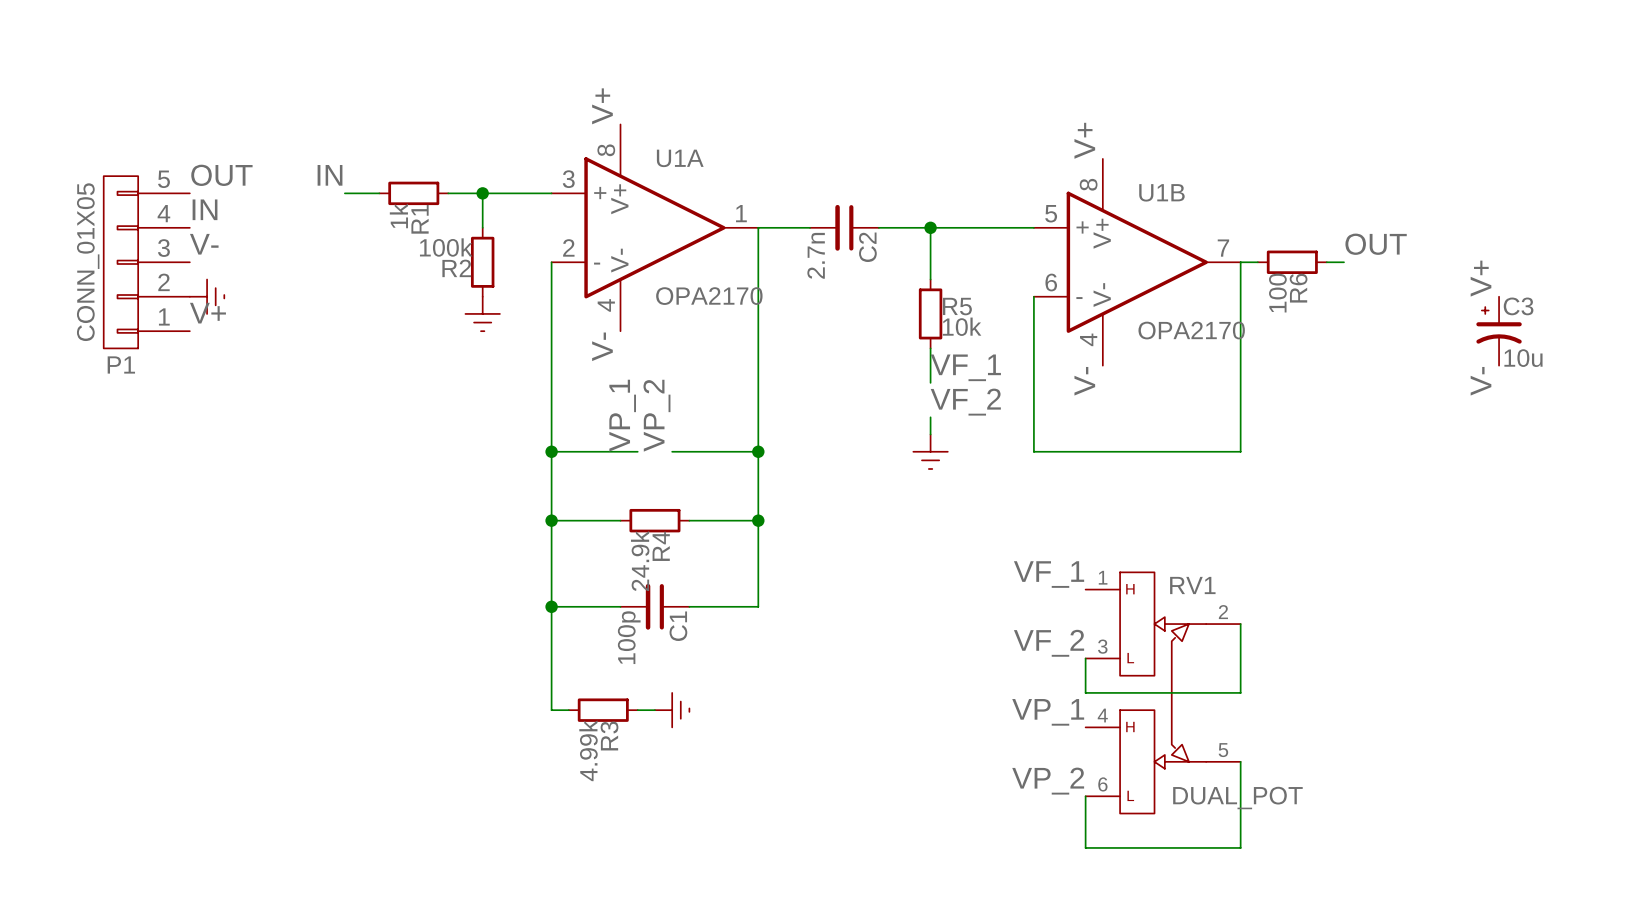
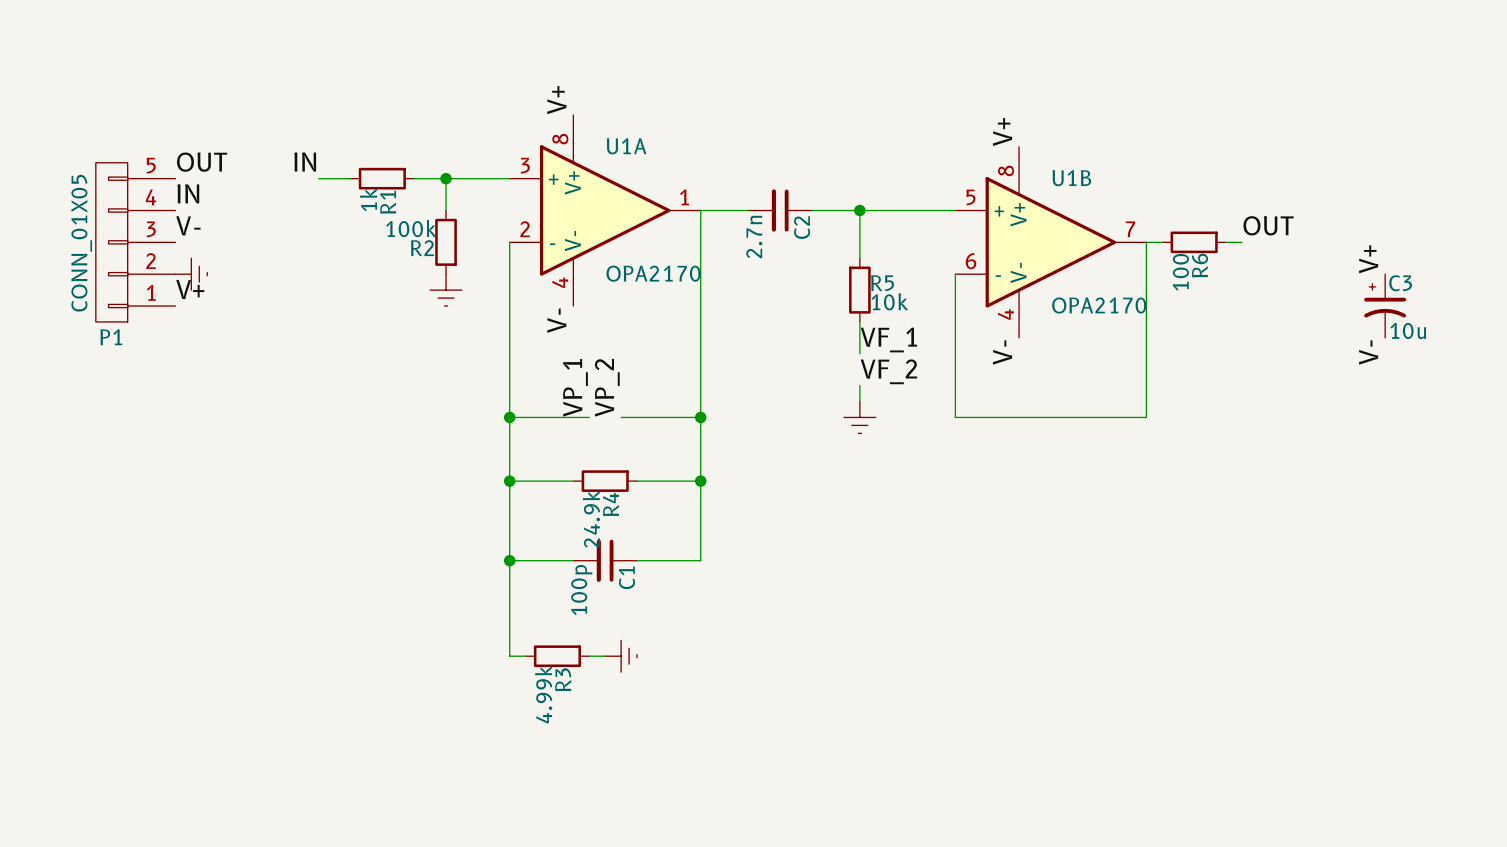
label: VF_1 (1049, 574) -> none
wire: (1240, 624) (1240, 692) (1085, 692) (1085, 658) -> none
label: VF_2 (1049, 643) -> none
RV1: DUAL_POT (1163, 692) -> none
label: VP_1 (1048, 712) -> none
wire: (1240, 761) (1240, 847) (1085, 847) (1085, 796) -> none
label: VP_2 (1048, 781) -> none

